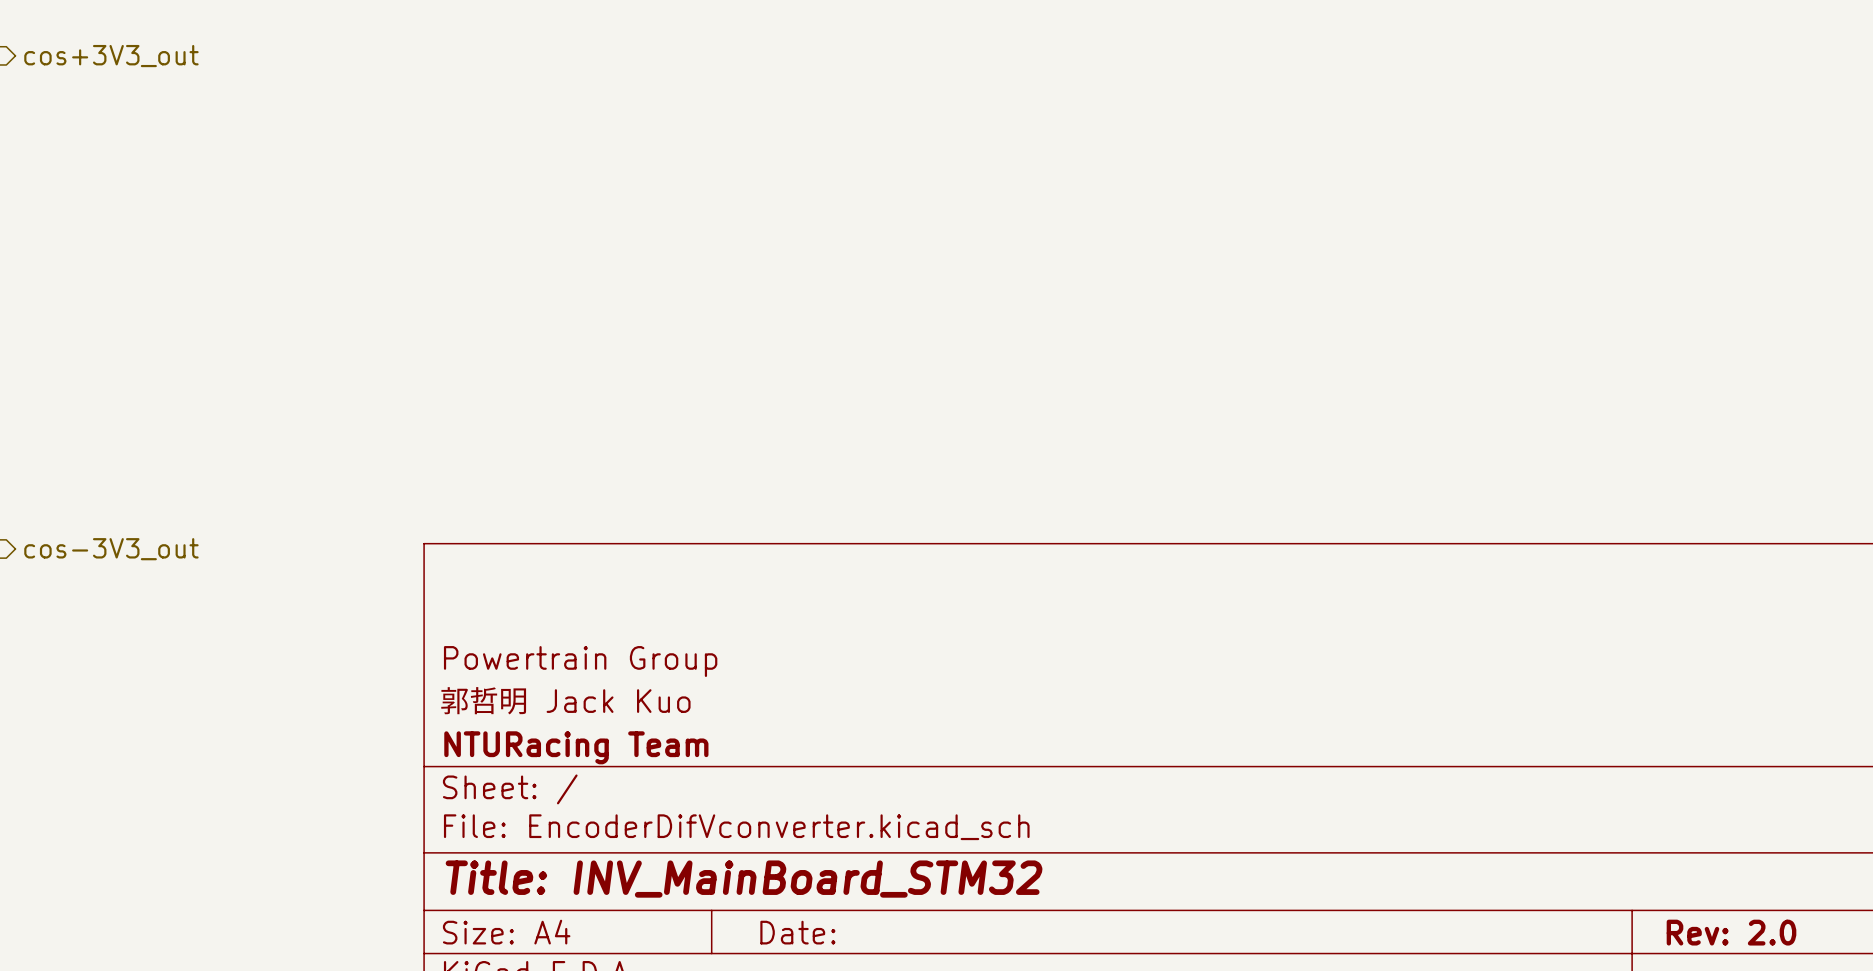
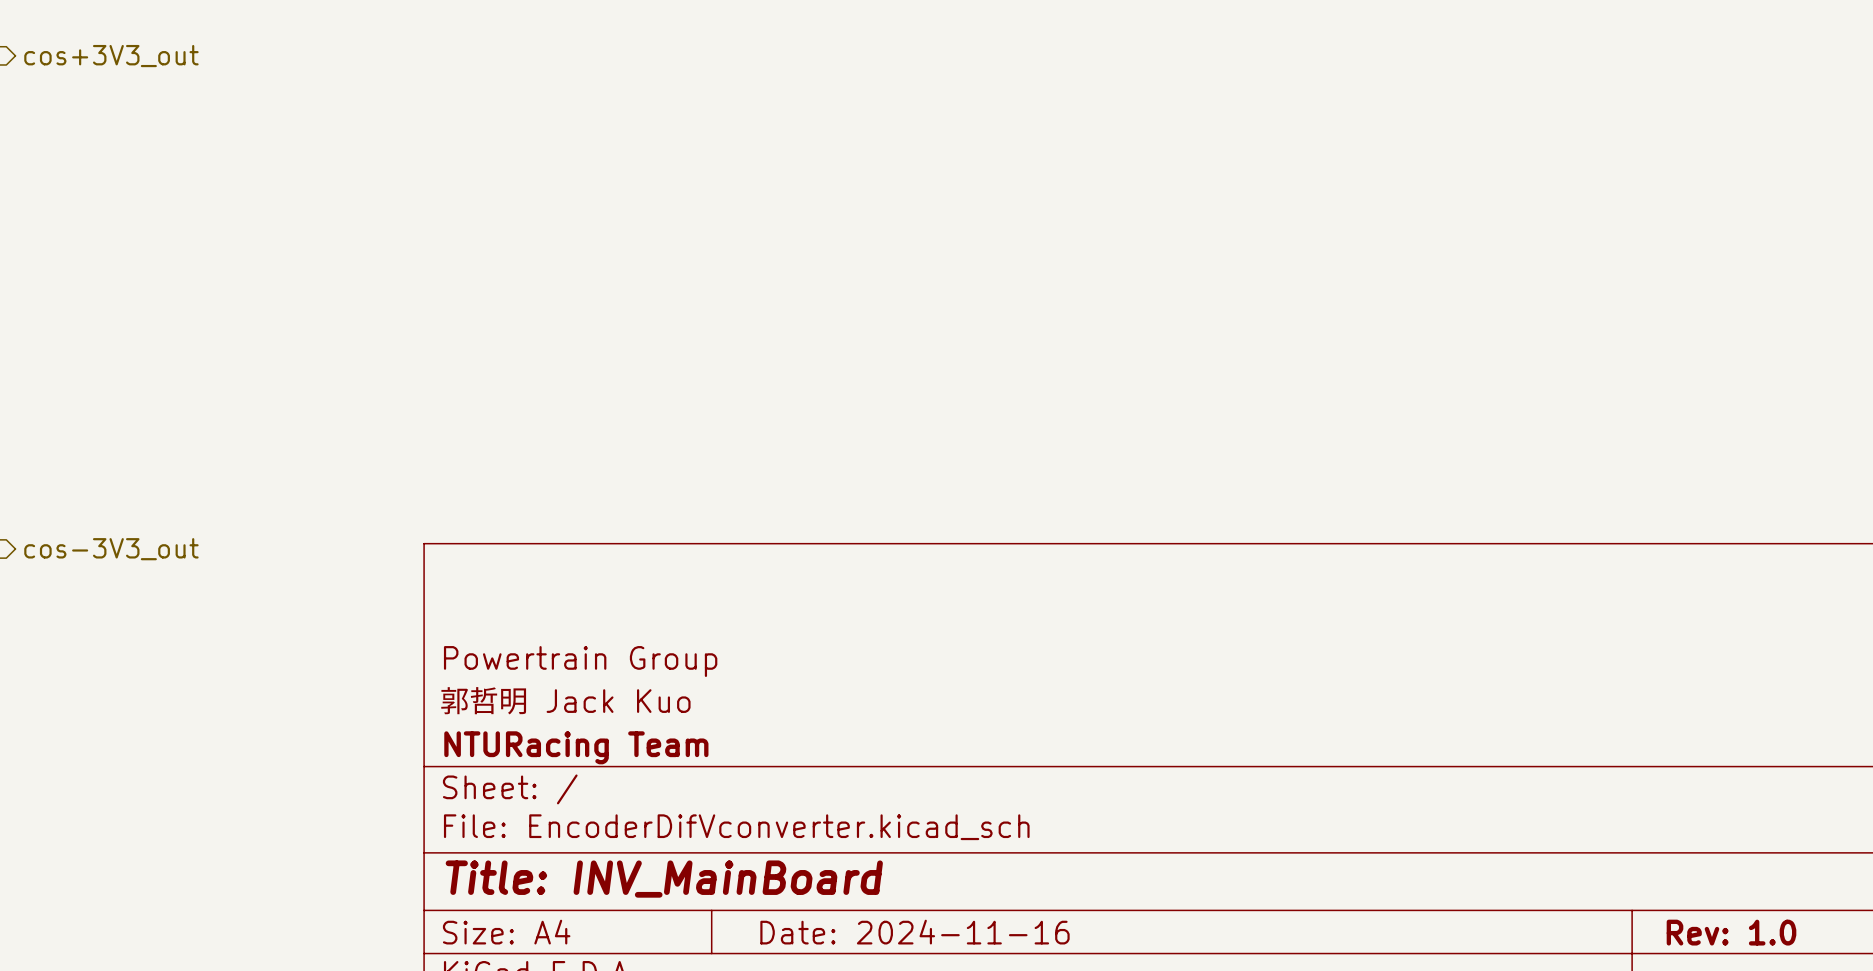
title block: Title: INV_MainBoard_STM32 (744, 879) -> Title: INV_MainBoard (664, 879)
title block: Date: (797, 932) -> Date: 2024-11-16 (914, 932)
title block: Rev: 2.0 (1731, 932) -> Rev: 1.0 (1731, 932)

